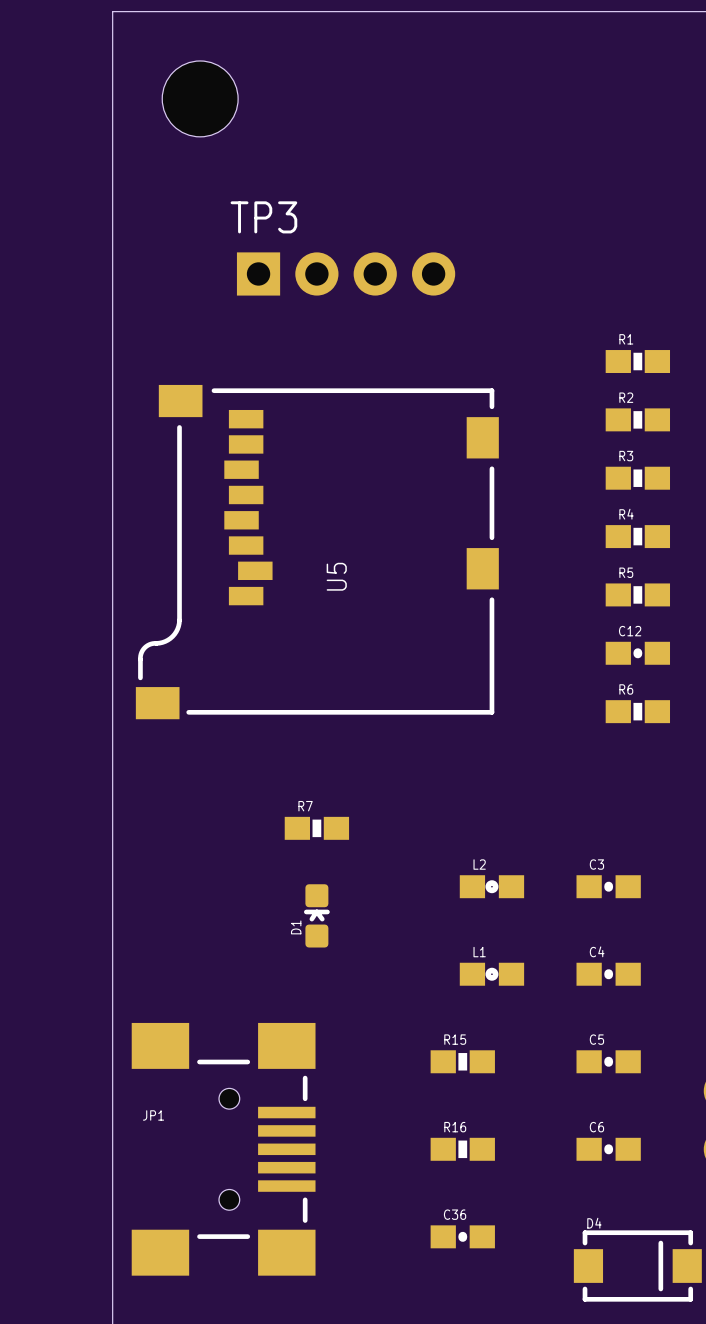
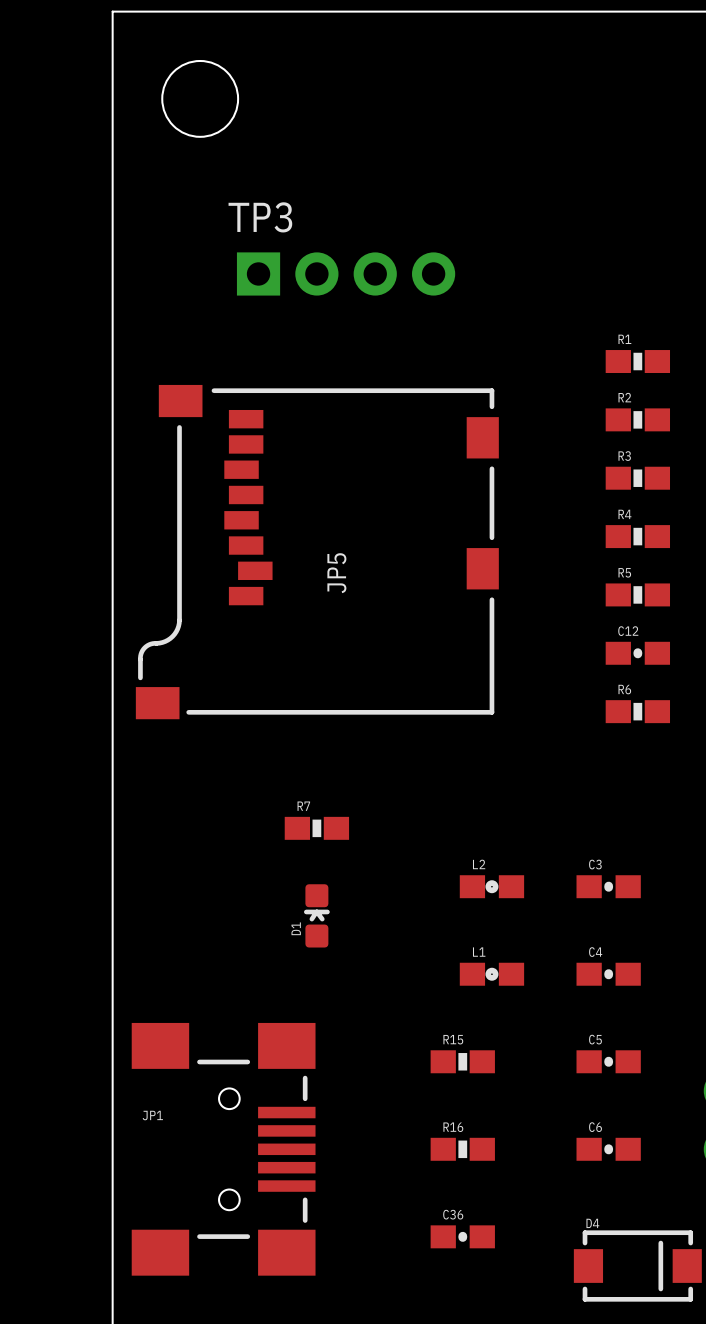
U5 name: U5 (336, 576) -> JP5 (336, 573)

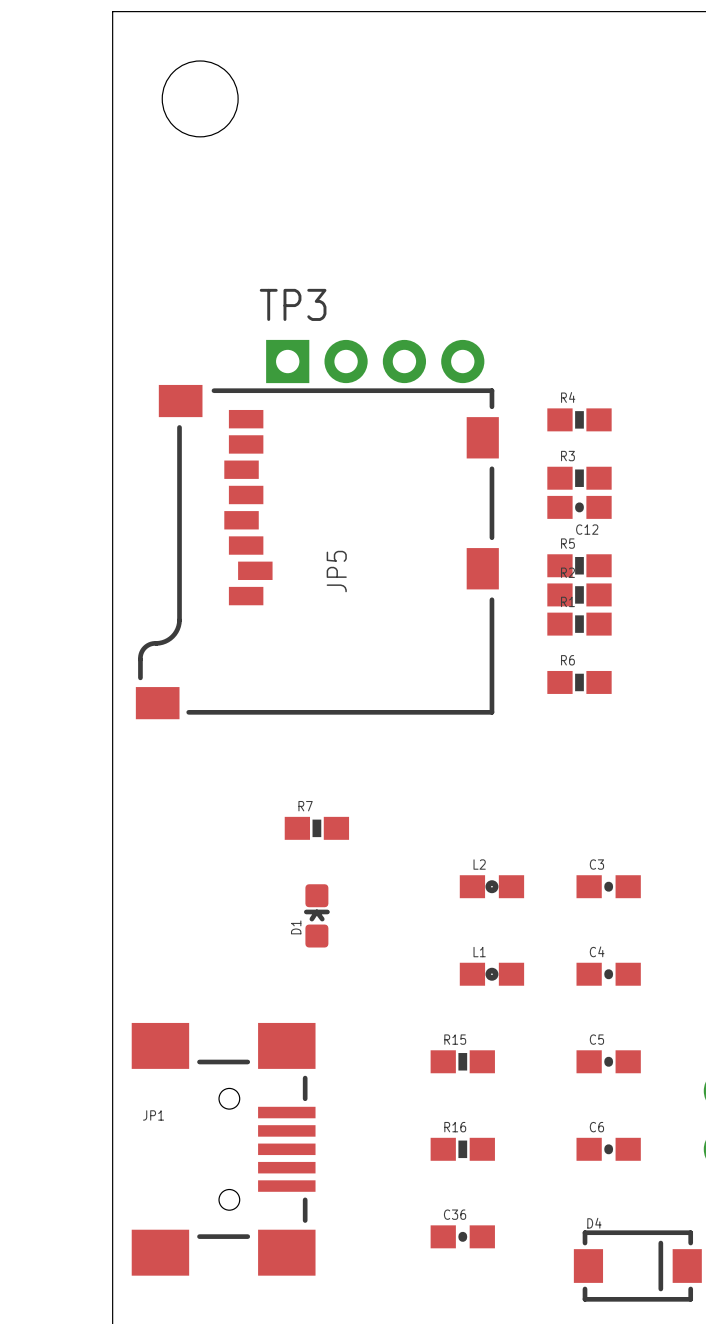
TP3 position: (346, 273) -> (375, 361)
R1 position: (637, 361) -> (579, 624)
R2 position: (637, 419) -> (579, 594)
R3 position: (637, 478) -> (579, 478)
R4 position: (637, 536) -> (579, 419)
R5 position: (637, 594) -> (579, 565)
C12 name position: C12 (628, 631) -> C12 (587, 529)
C12 position: (637, 653) -> (579, 507)
R6 position: (637, 711) -> (579, 682)

